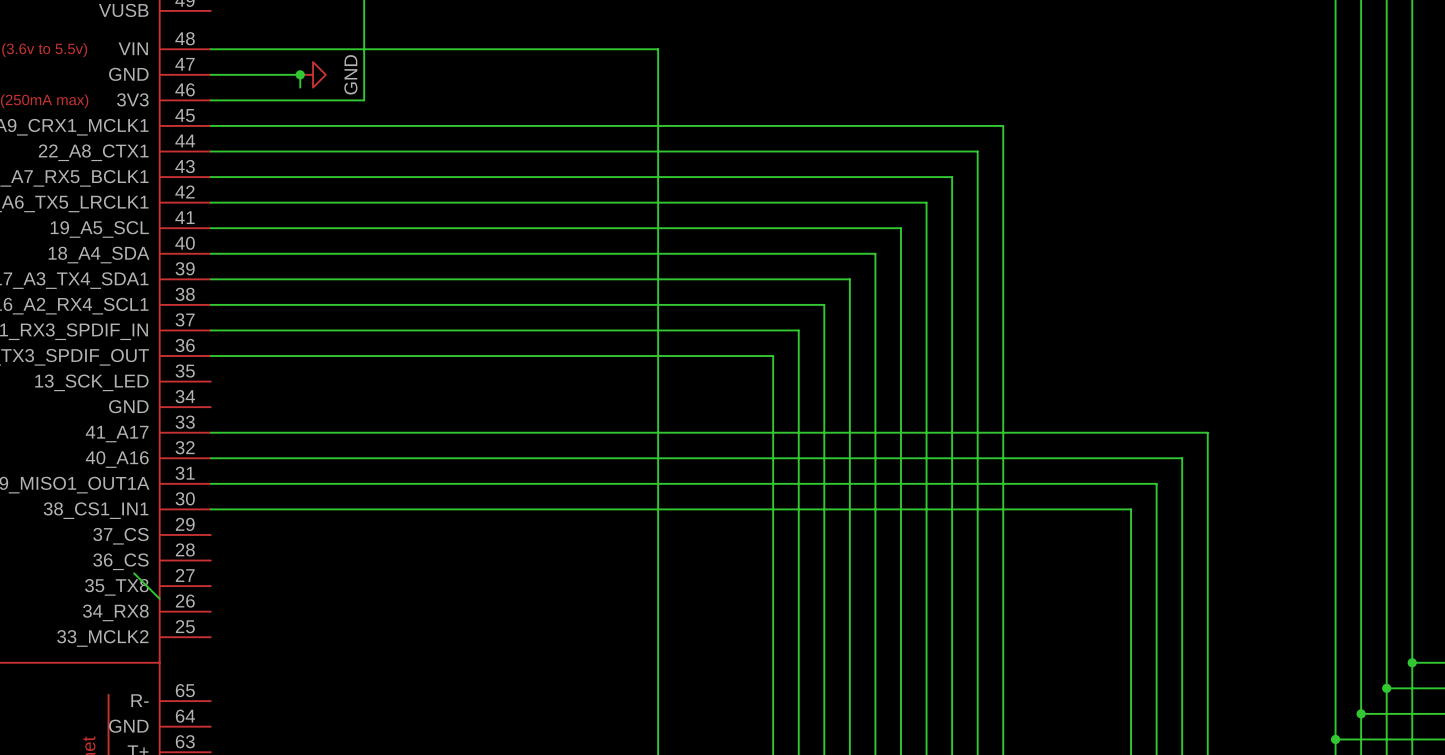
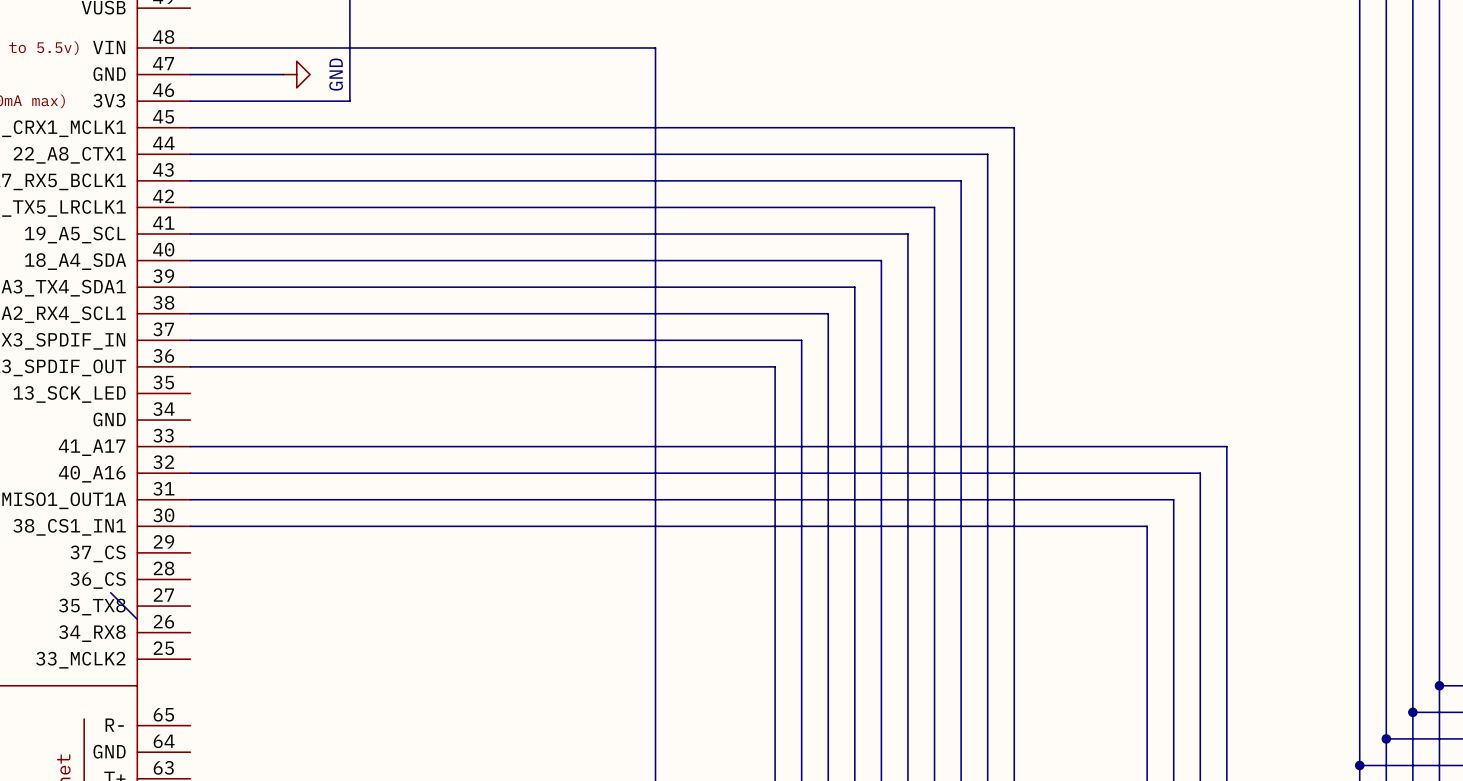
wire: (300, 74) (300, 87) -> none
junction: (300, 74) -> none

